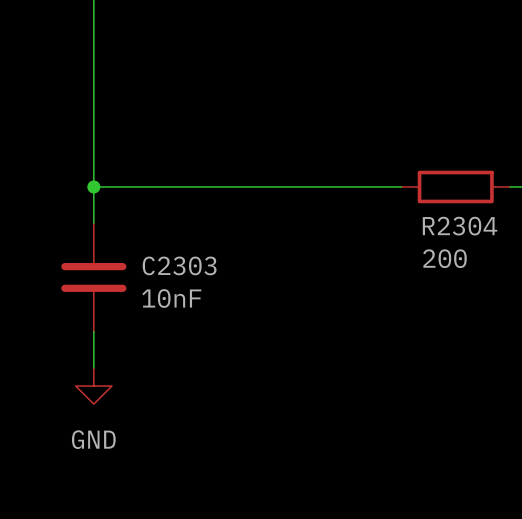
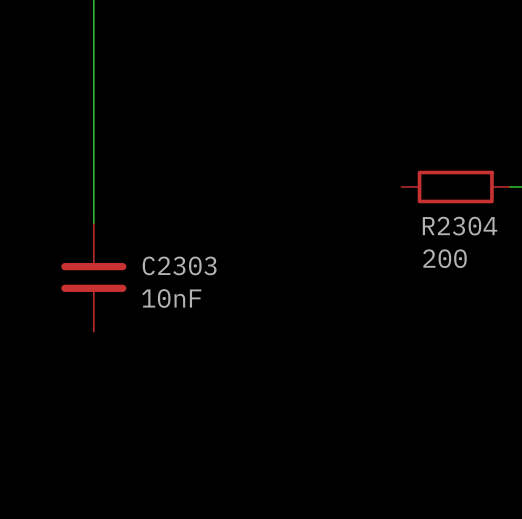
wire: (93, 186) (401, 186) -> none
junction: (93, 186) -> none
wire: (93, 331) (93, 367) -> none
power symbol: GND (93, 386) -> none

